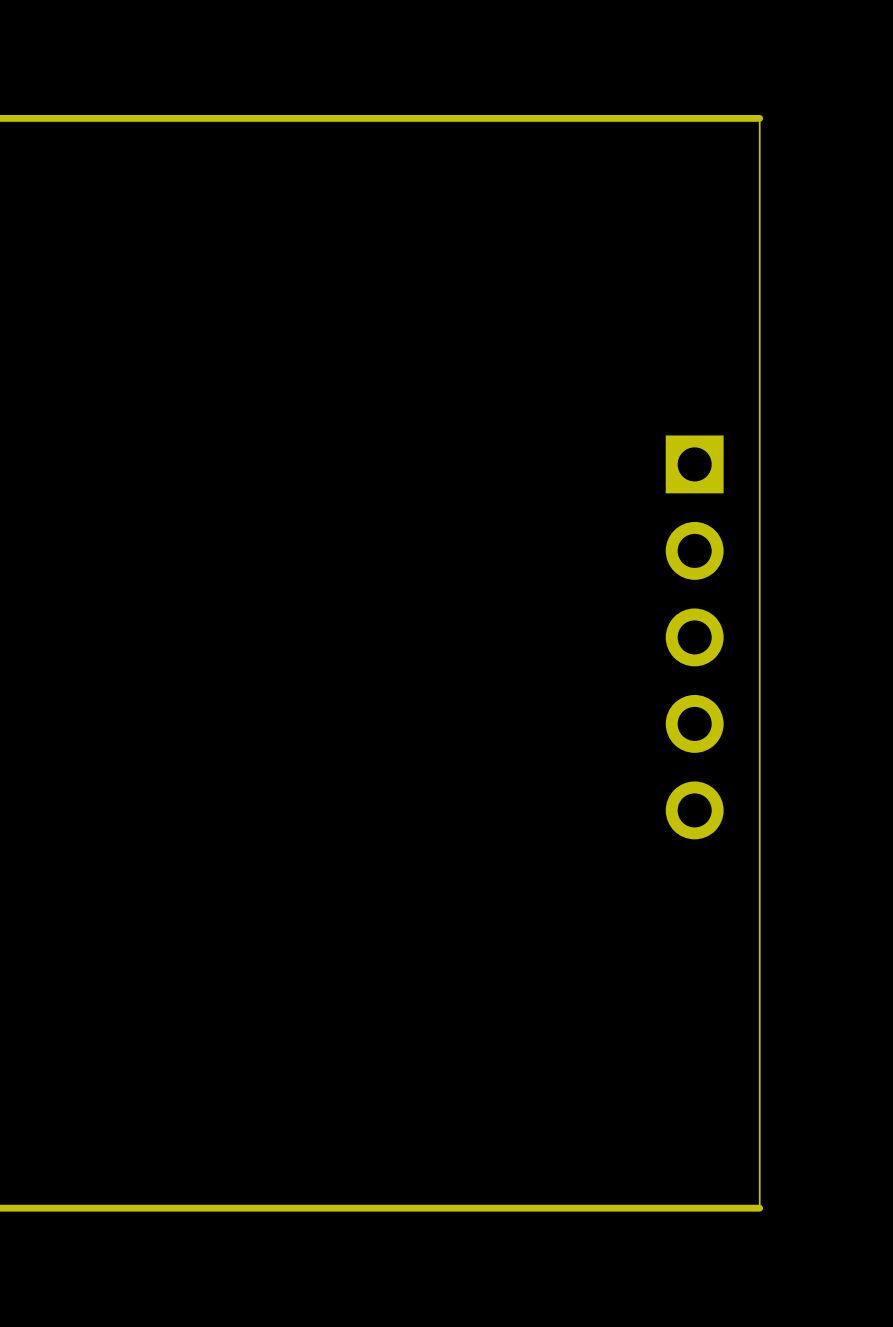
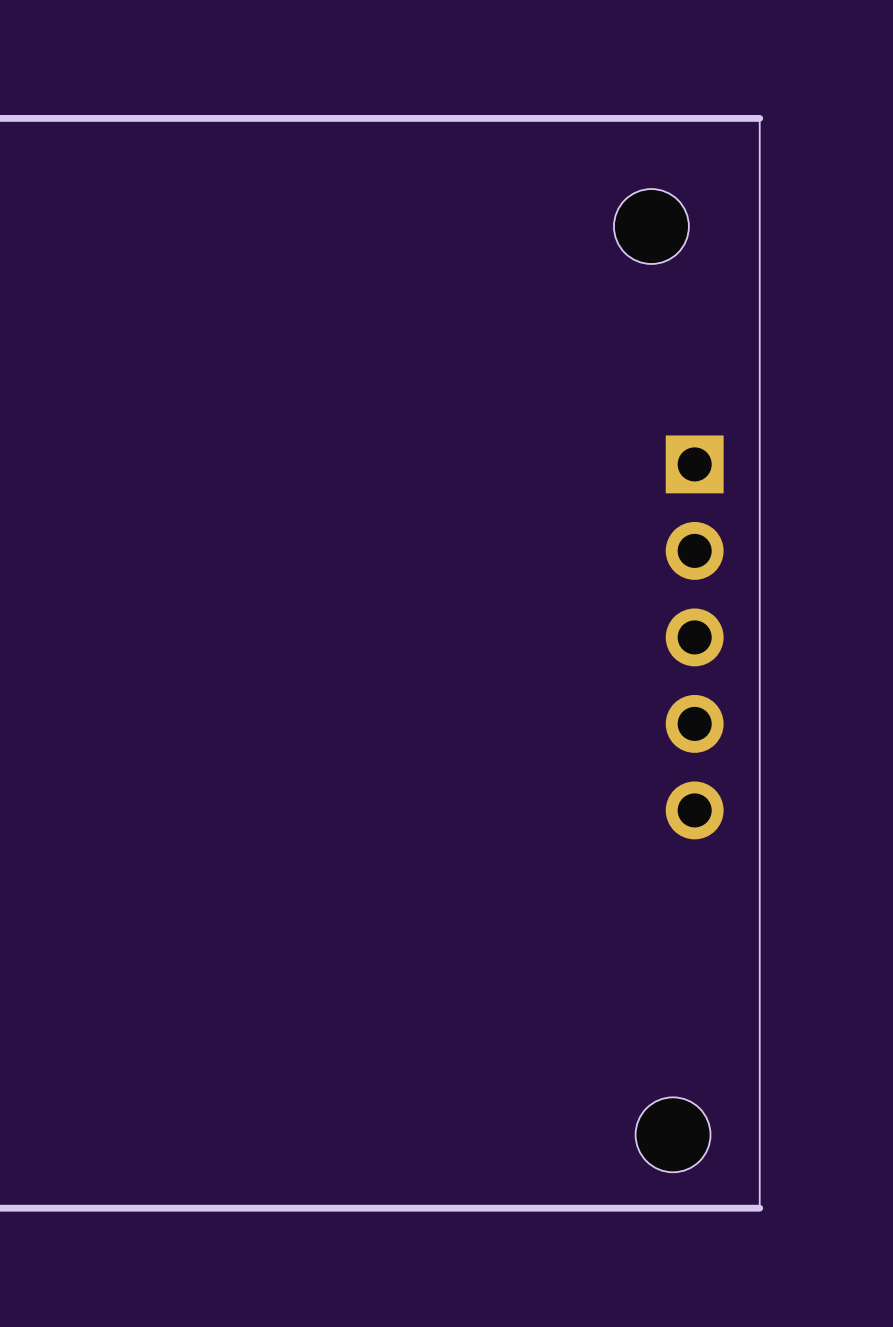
part: none -> (651, 226)
part: none -> (673, 1134)

